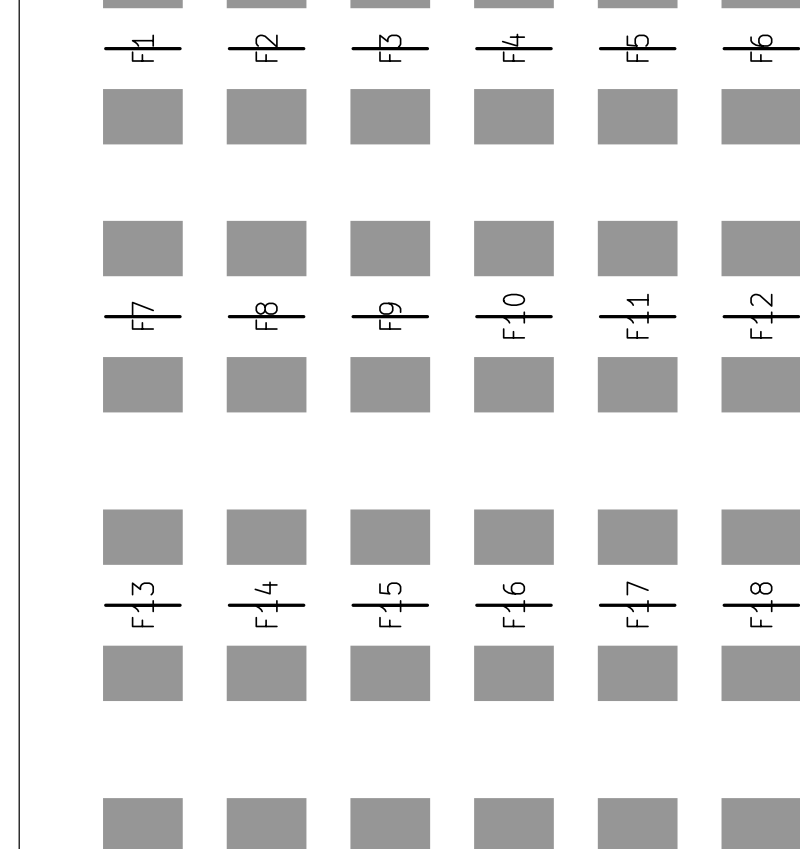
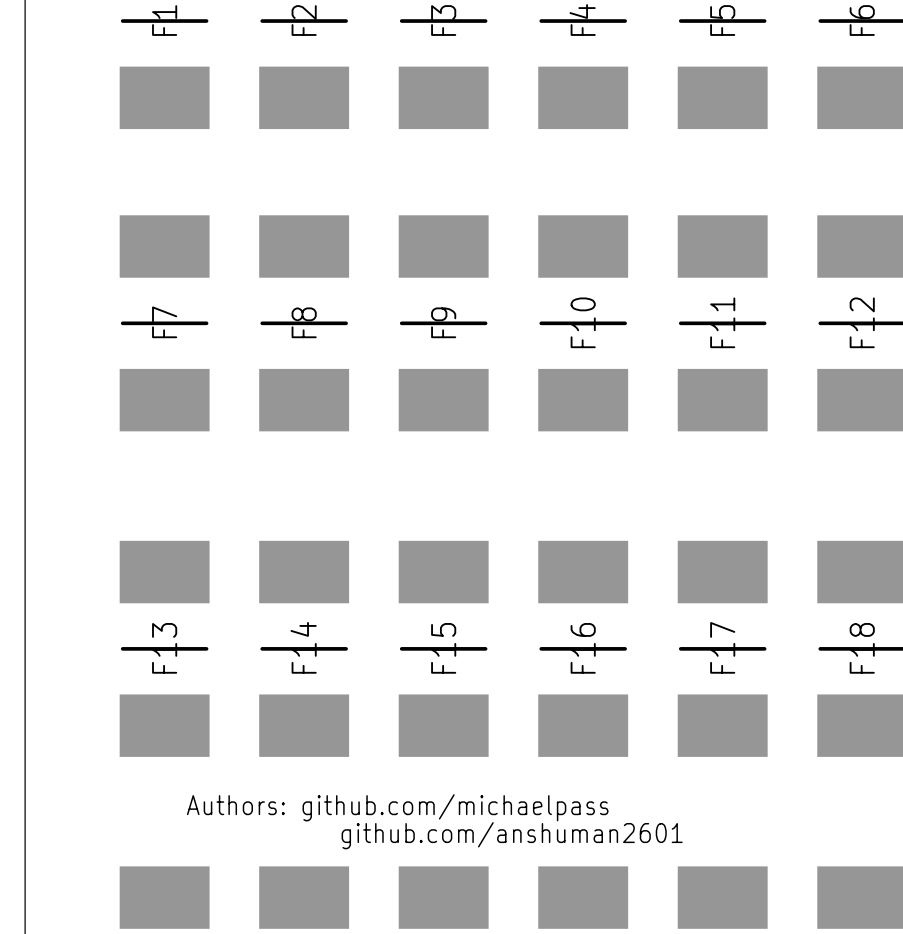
text: none -> Authors: github.com/michaelpass (397, 807)
text: none -> github.com/anshuman2601 (512, 835)

